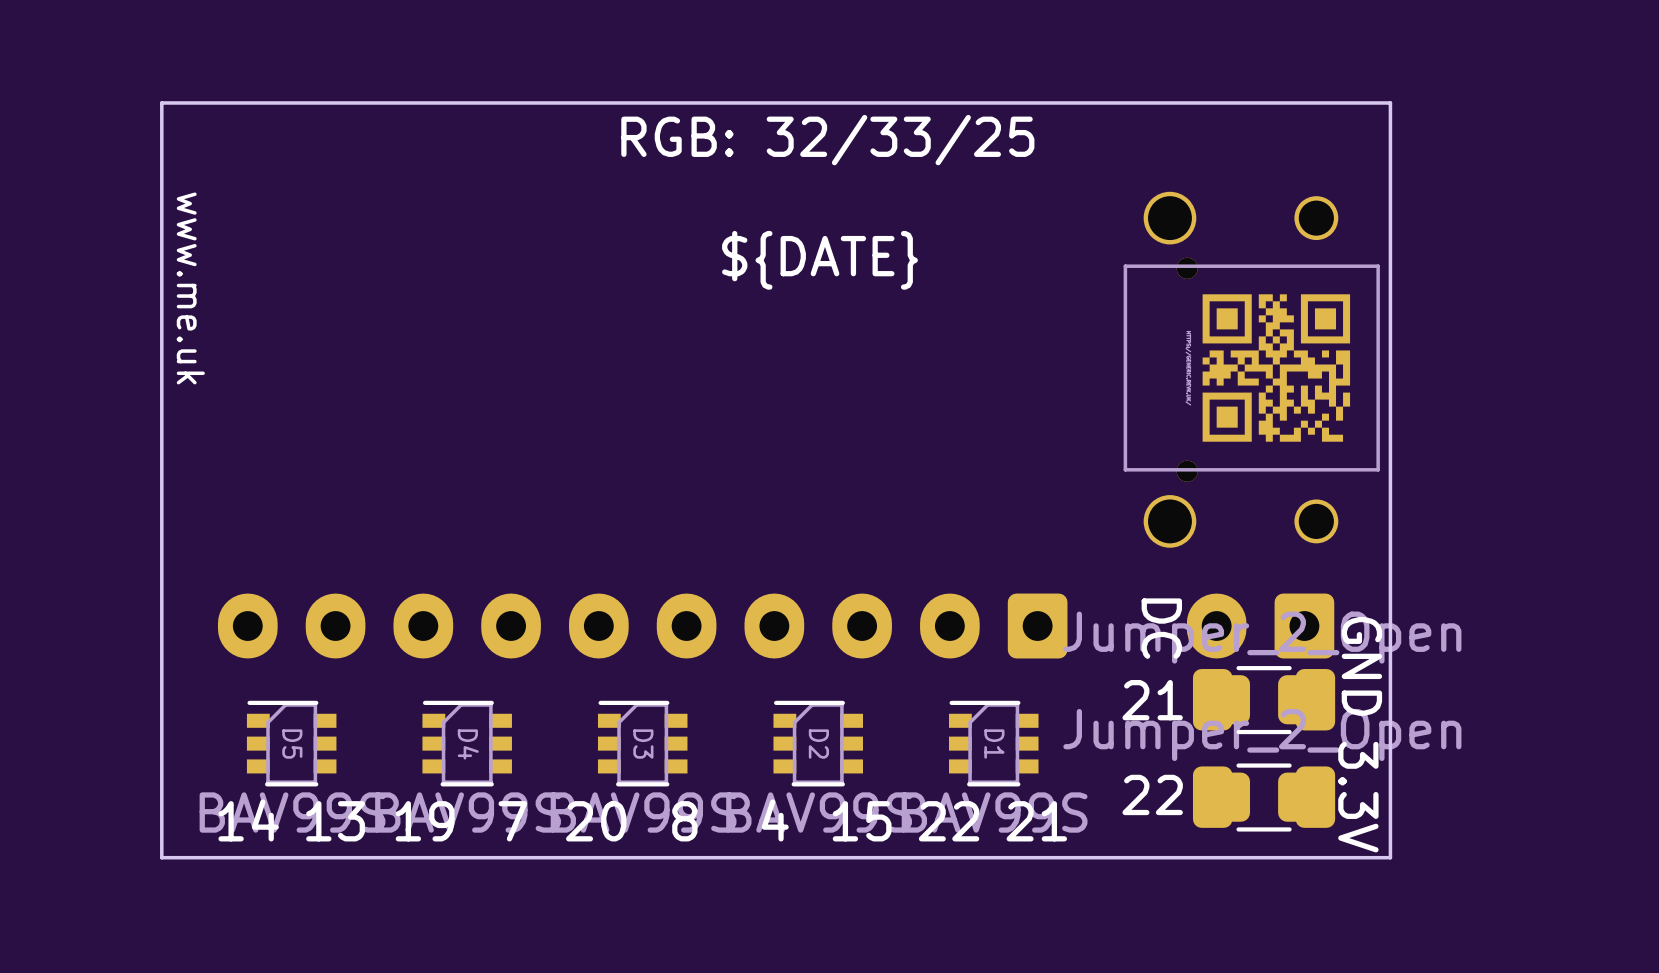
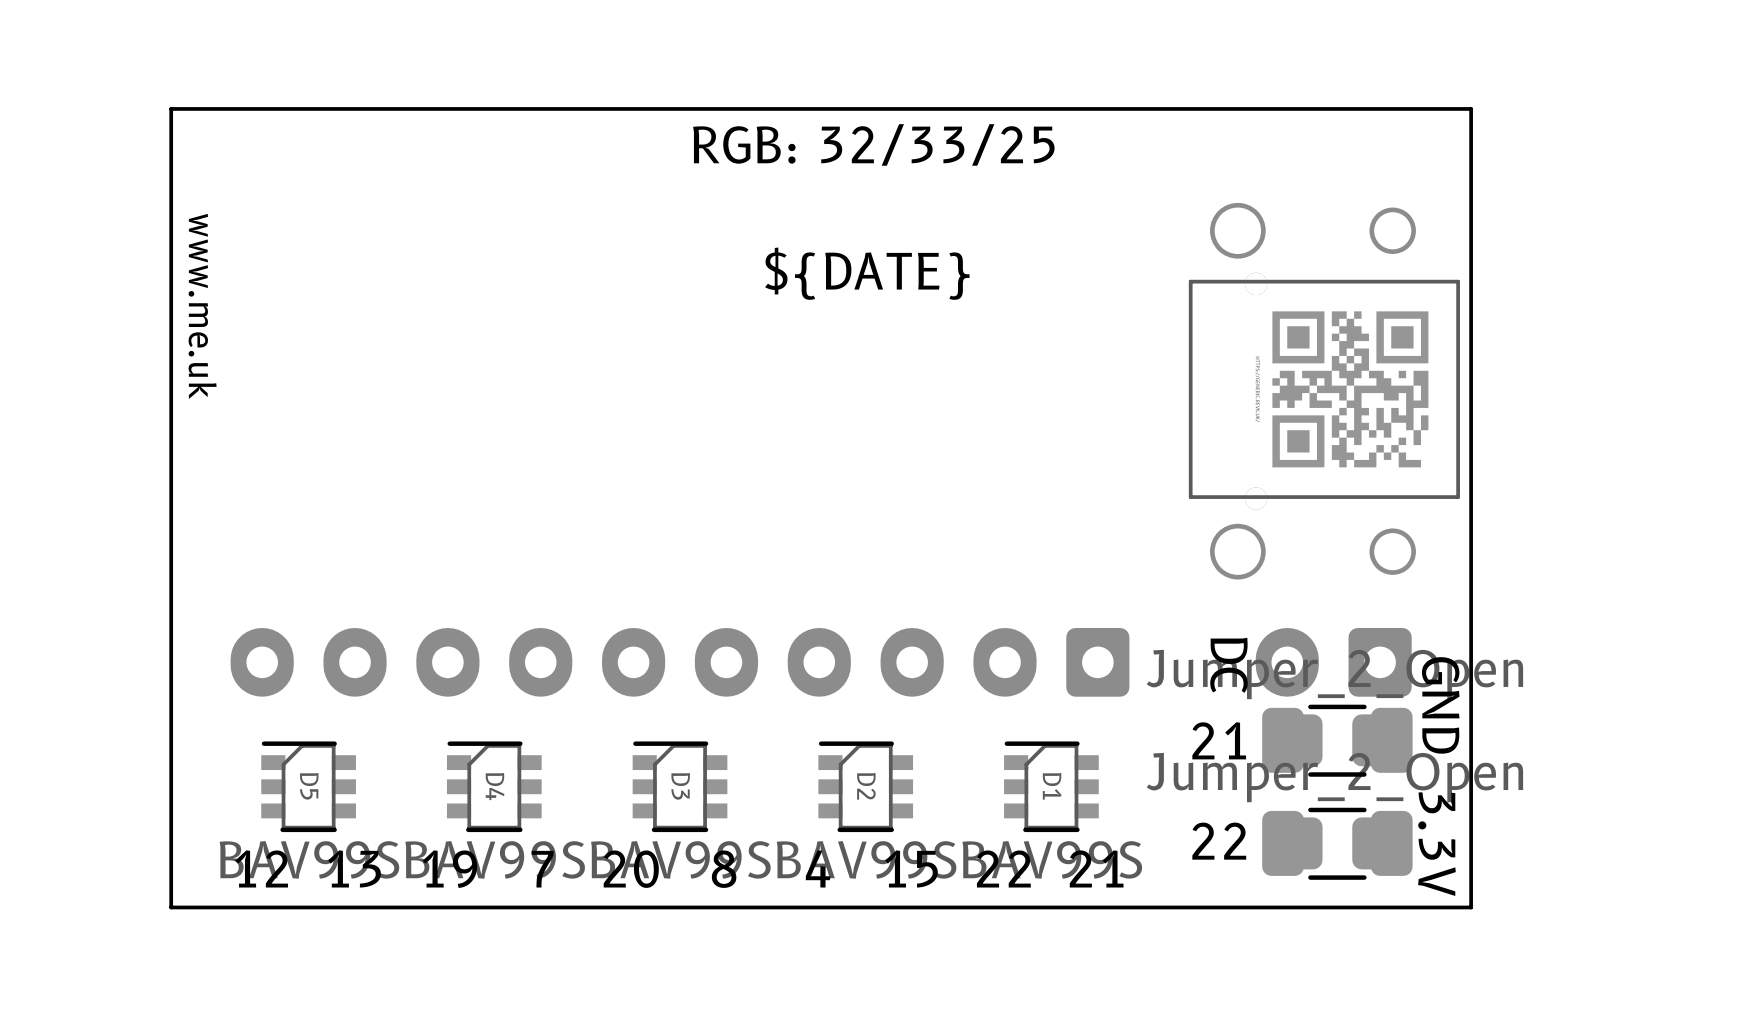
text: 14 (248, 820) -> 12 (261, 868)

